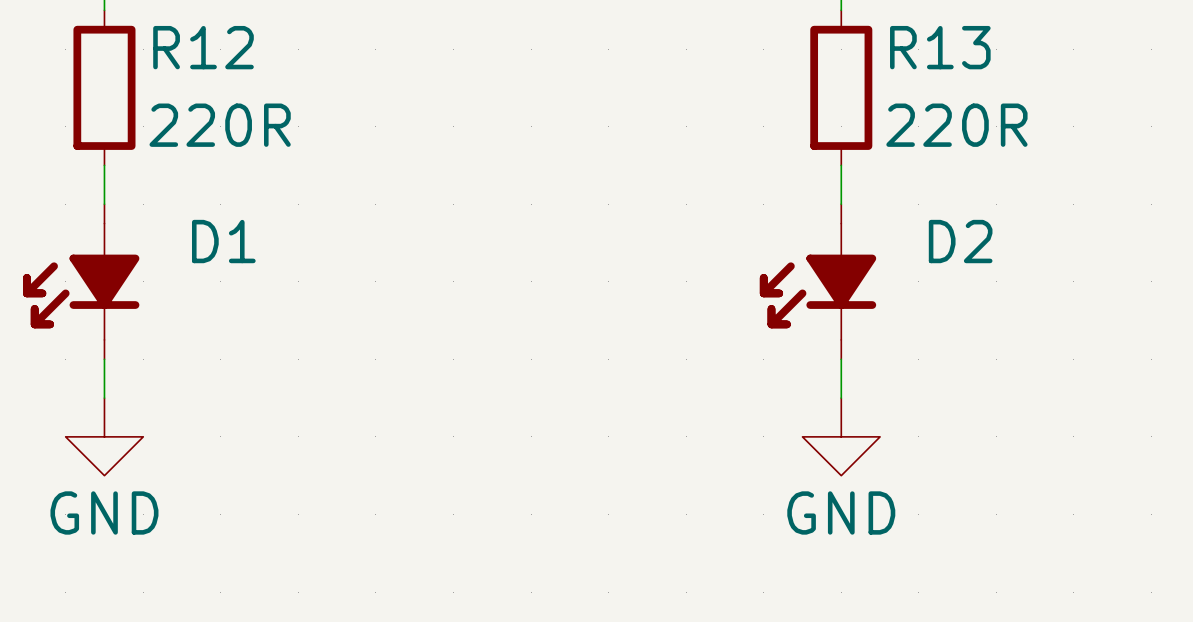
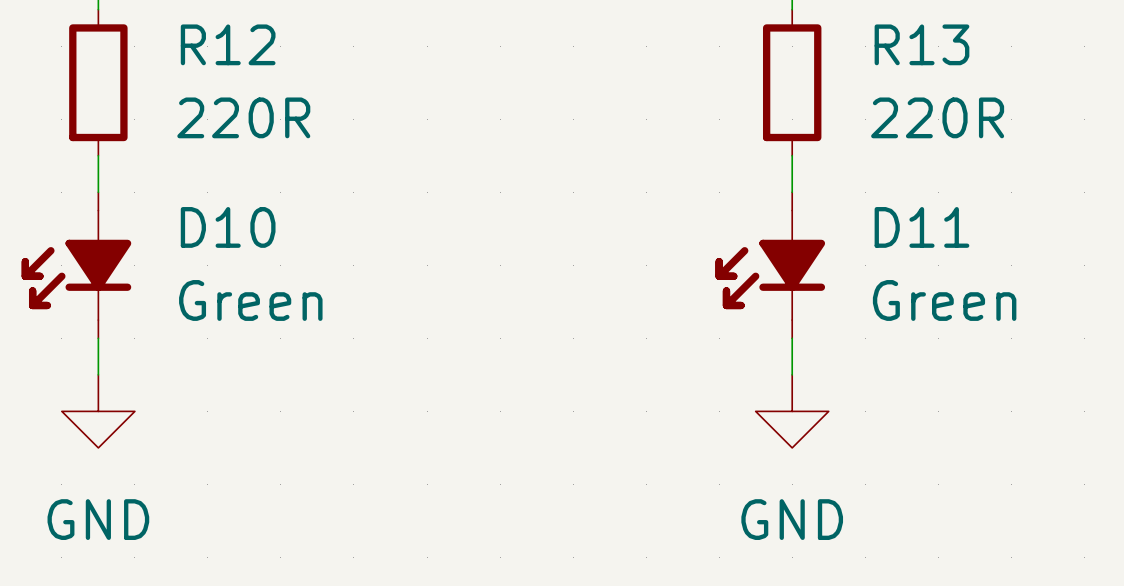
R12 name position: R12 (203, 47) -> R12 (228, 44)
R13 name position: R13 (940, 47) -> R13 (921, 44)
R12 text position: 220R (220, 125) -> 220R (243, 117)
R13 text position: 220R (956, 125) -> 220R (937, 117)
D1 name: D1 (223, 241) -> D10 (228, 227)
D2 name: D2 (960, 241) -> D11 (921, 227)
D1 text: none -> Green (250, 300)
D2 text: none -> Green (944, 300)
power symbol text position: GND (104, 512) -> GND (98, 519)
power symbol text position: GND (841, 512) -> GND (792, 519)

